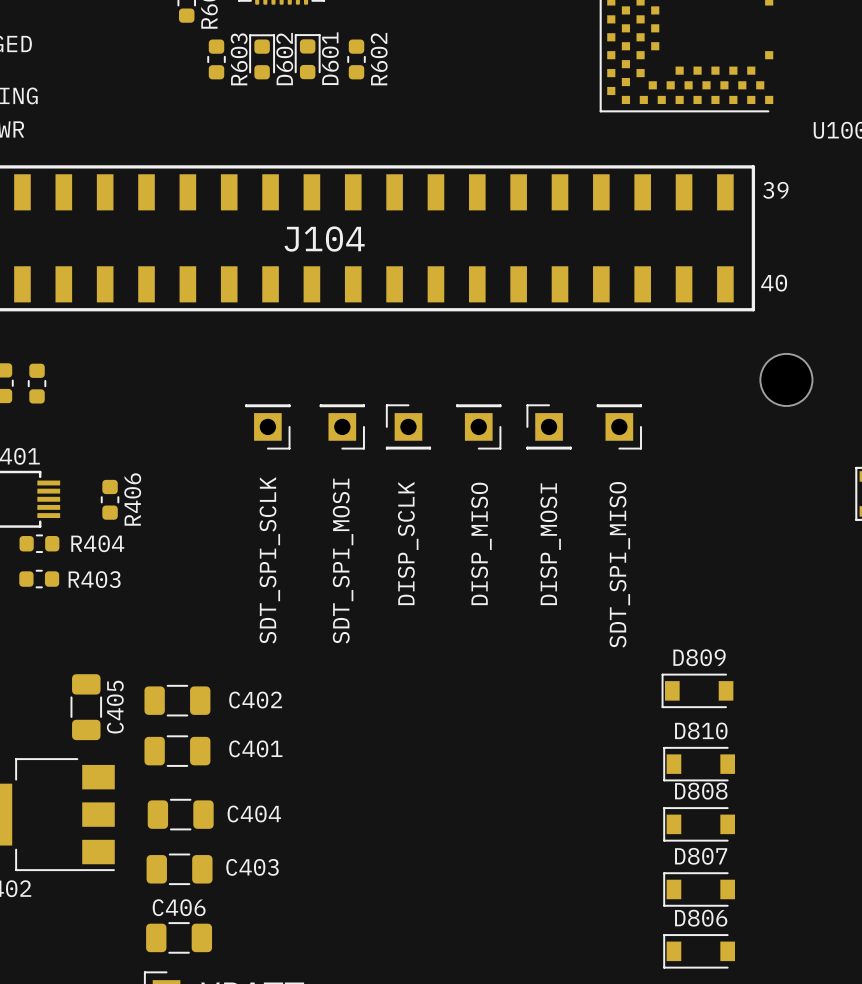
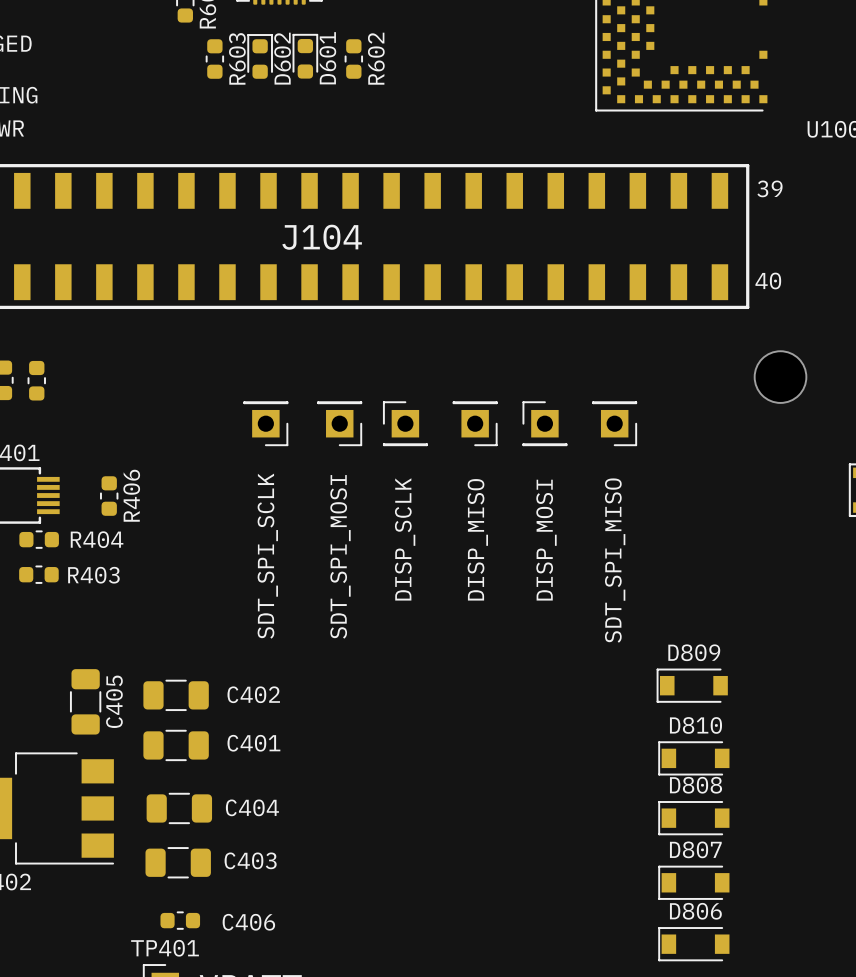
C406 name position: C406 (179, 907) -> C406 (248, 922)
C406 footprint: [146, 922, 213, 954] -> [160, 911, 201, 930]
TP401 name: none -> TP401 (165, 948)

